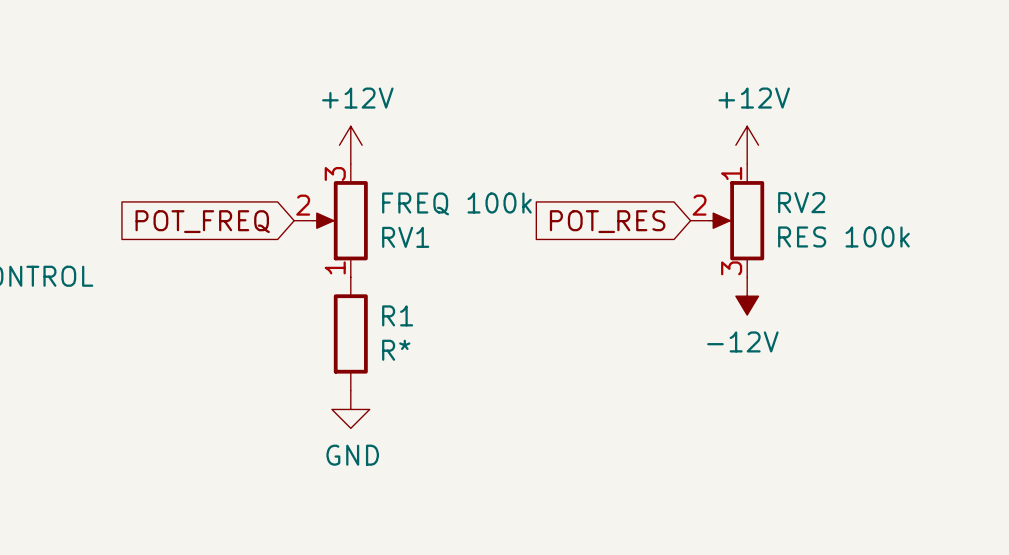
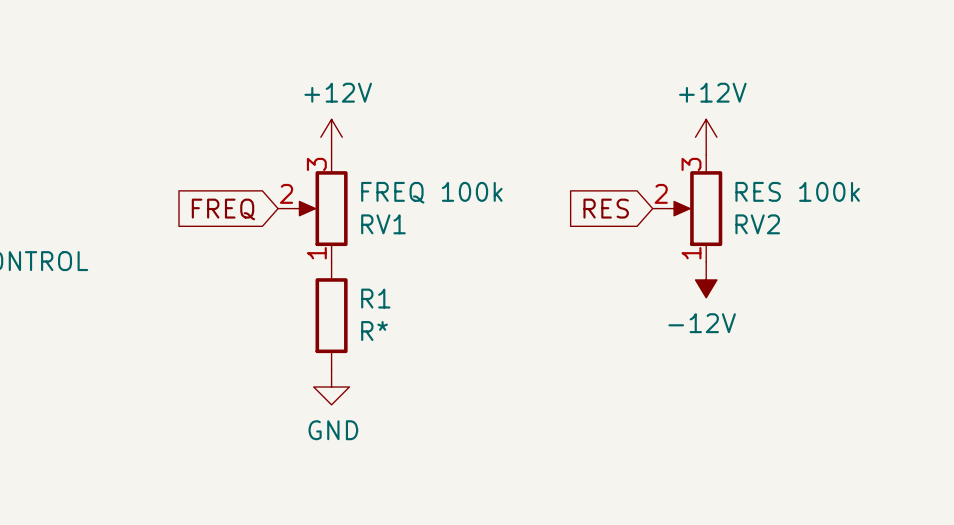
RV2 flip: as is (736, 220) -> up-down (696, 208)
global label: POT_FREQ (202, 221) -> FREQ (223, 209)
global label: POT_RES (607, 221) -> RES (606, 208)

